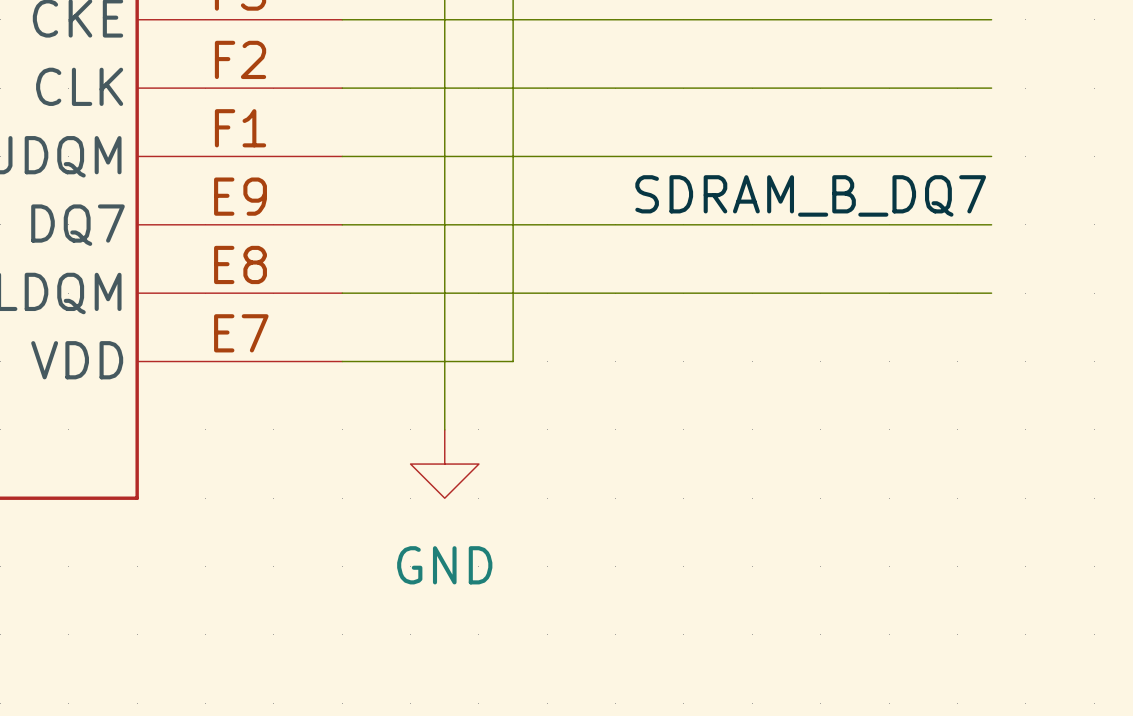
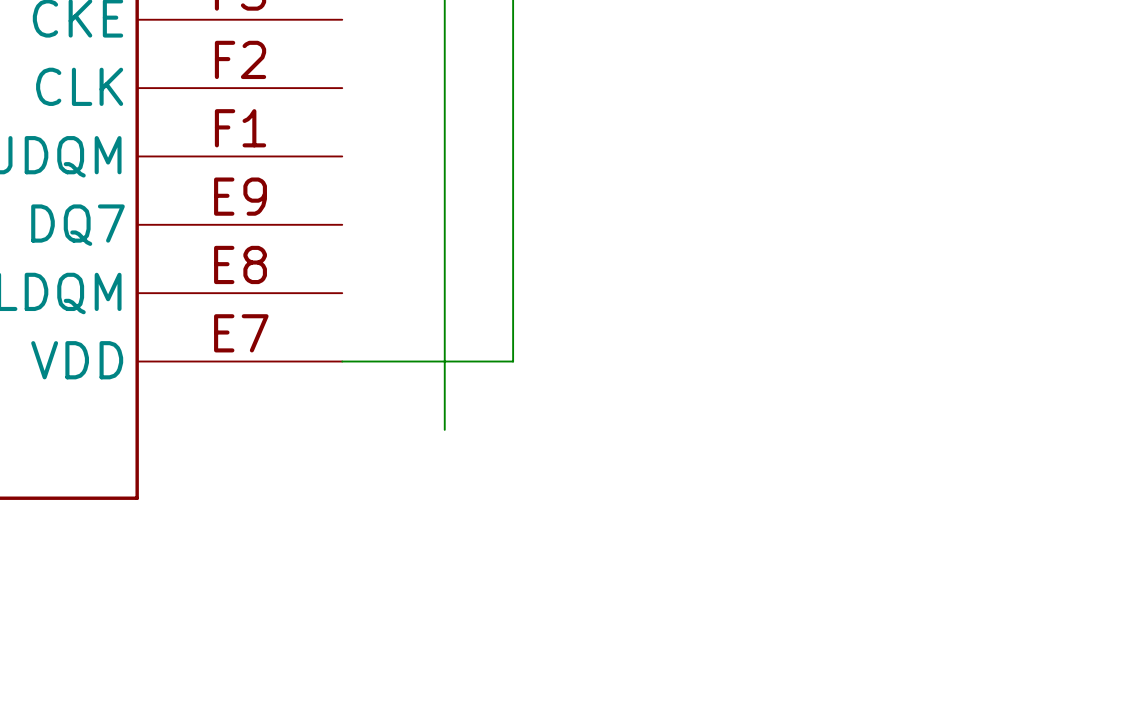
wire: (342, 19) (991, 19) -> none
wire: (342, 88) (991, 88) -> none
wire: (342, 156) (991, 156) -> none
label: SDRAM_B_DQ7 (810, 195) -> none
wire: (342, 224) (991, 224) -> none
wire: (342, 293) (991, 293) -> none
power symbol: GND (444, 464) -> none

